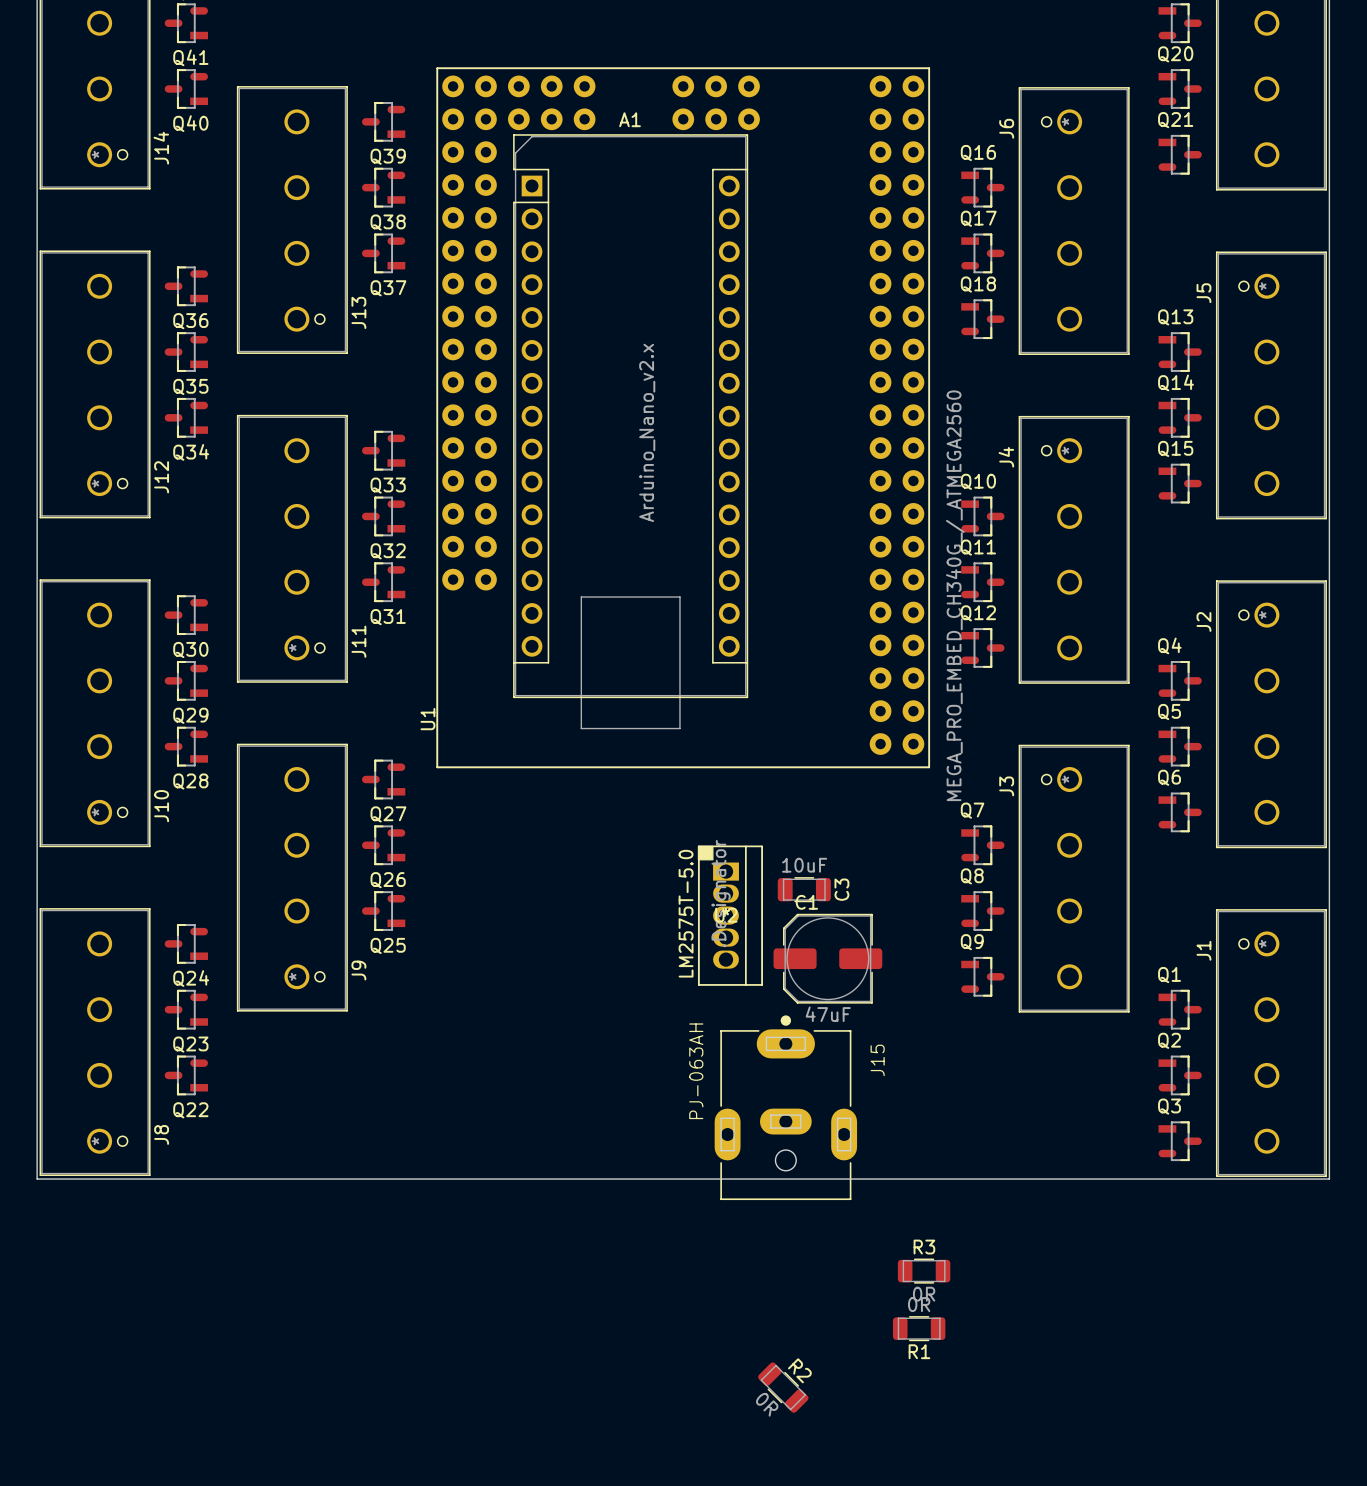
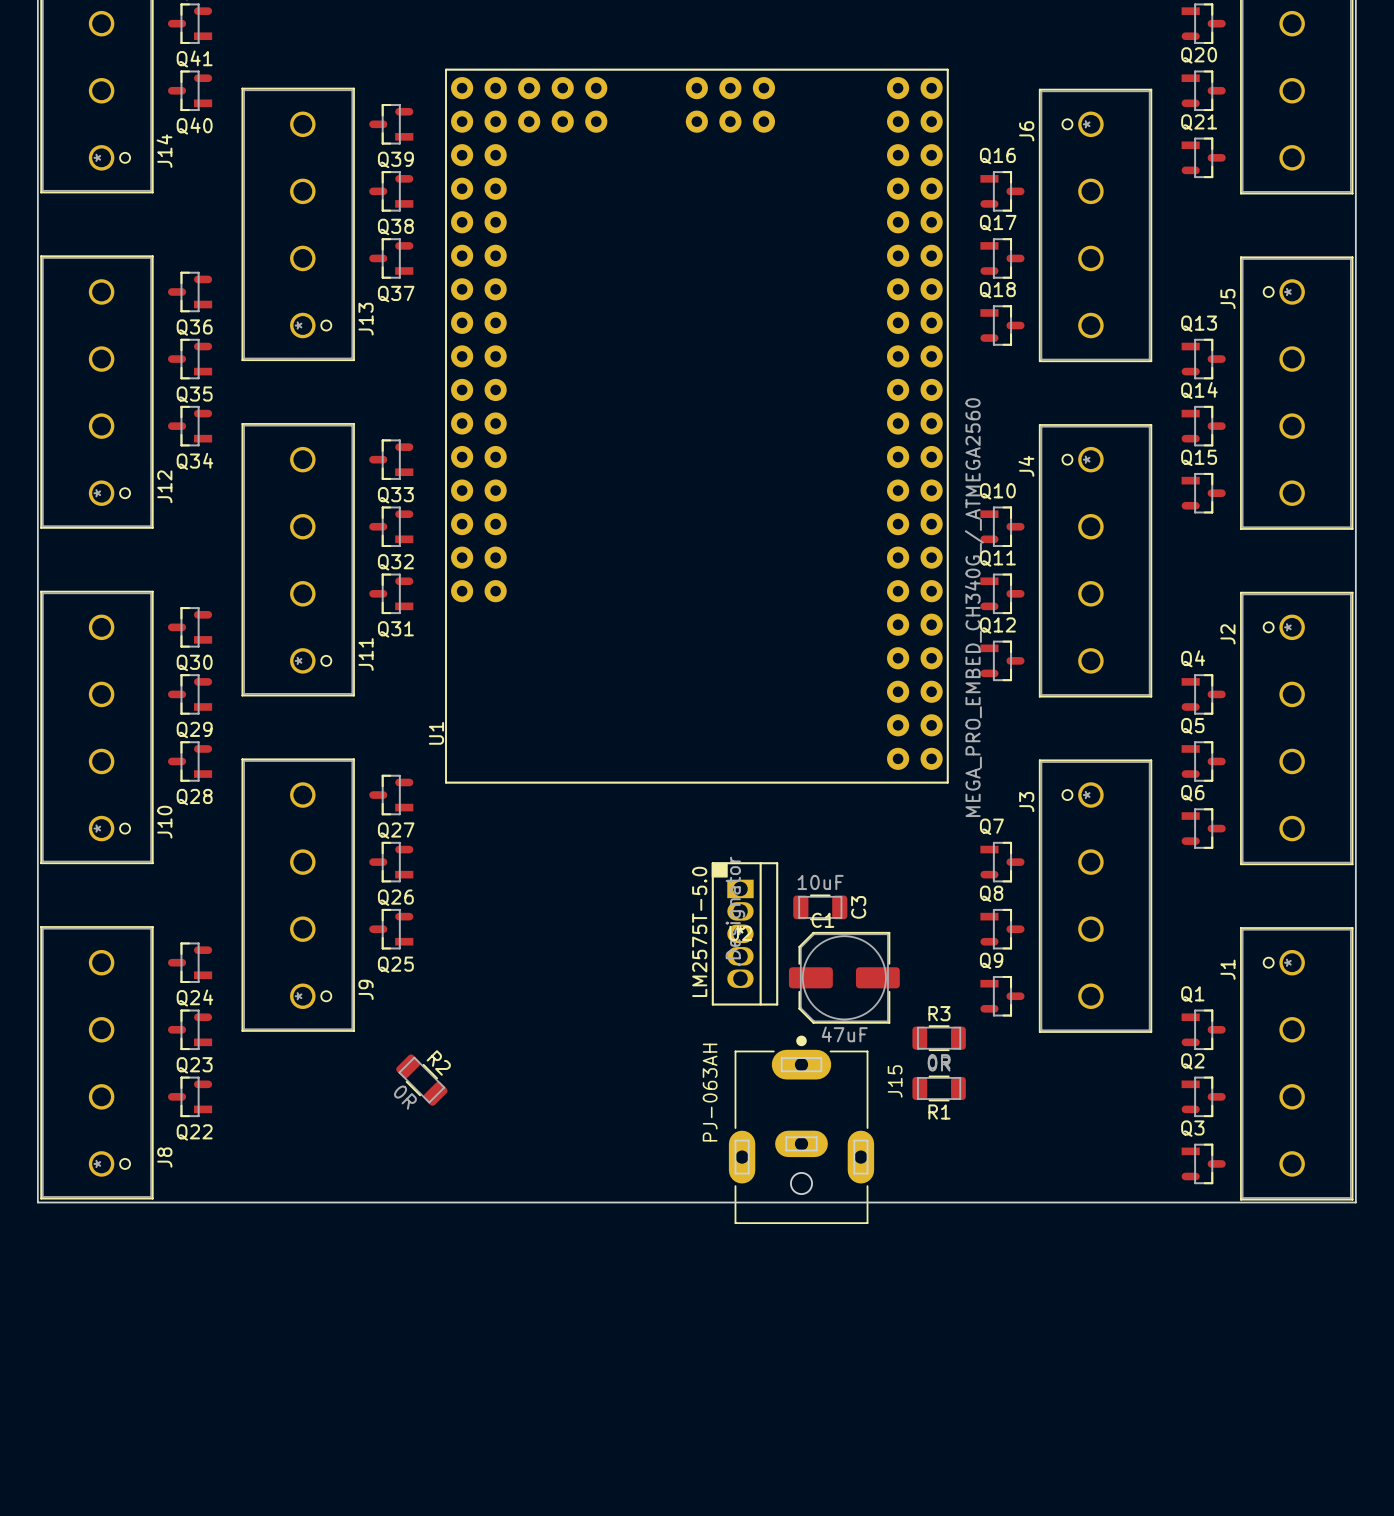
J13 text: none -> * (298, 325)
A1: Arduino_Nano_v2.x (630, 431) -> none
R3 position: (924, 1271) -> (939, 1038)
R1 position: (919, 1328) -> (939, 1088)
R2 position: (783, 1387) -> (421, 1080)

